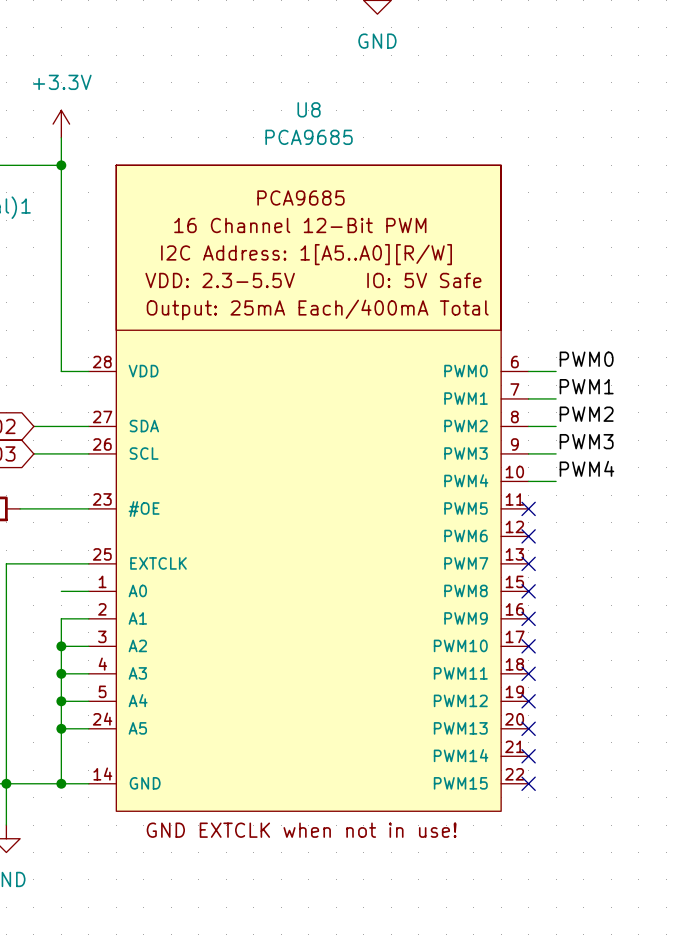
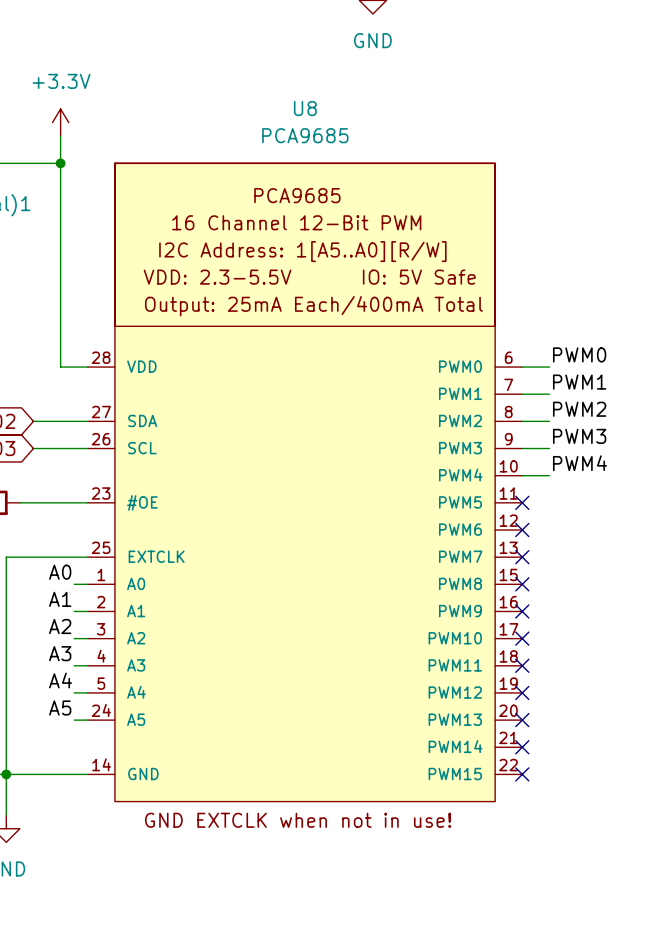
label: none -> A0 (60, 572)
wire: (61, 591) (75, 591) -> none
label: none -> A1 (60, 599)
wire: (75, 618) (61, 618) (61, 783) -> none
label: none -> A2 (60, 626)
wire: (61, 646) (75, 646) -> none
junction: (61, 646) -> none
label: none -> A3 (60, 653)
wire: (61, 673) (75, 673) -> none
junction: (61, 673) -> none
label: none -> A4 (60, 680)
wire: (61, 701) (75, 701) -> none
junction: (61, 701) -> none
label: none -> A5 (60, 707)
wire: (61, 728) (75, 728) -> none
junction: (61, 728) -> none
junction: (61, 783) -> none

